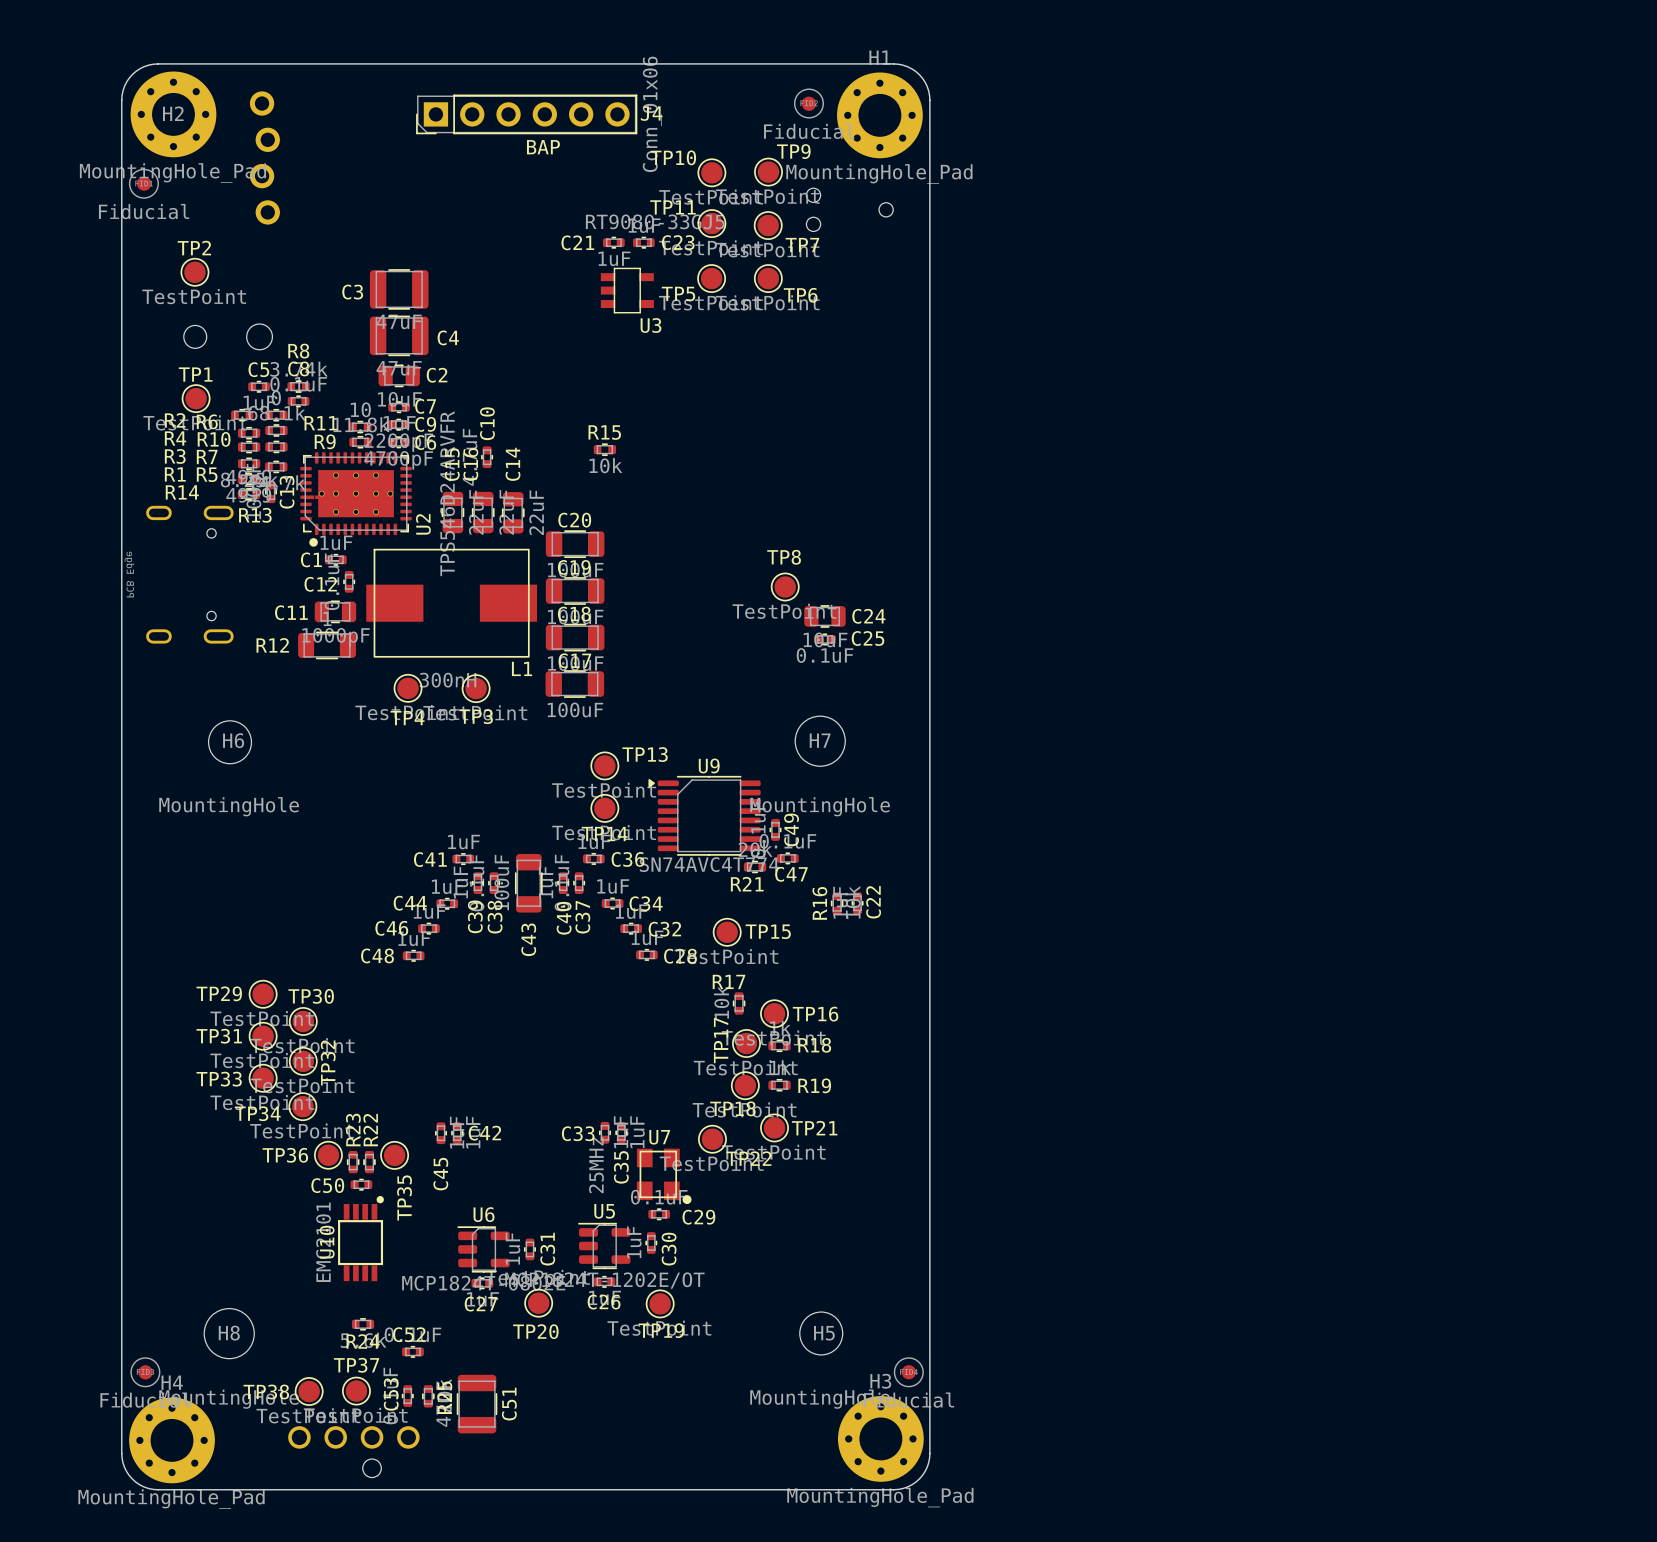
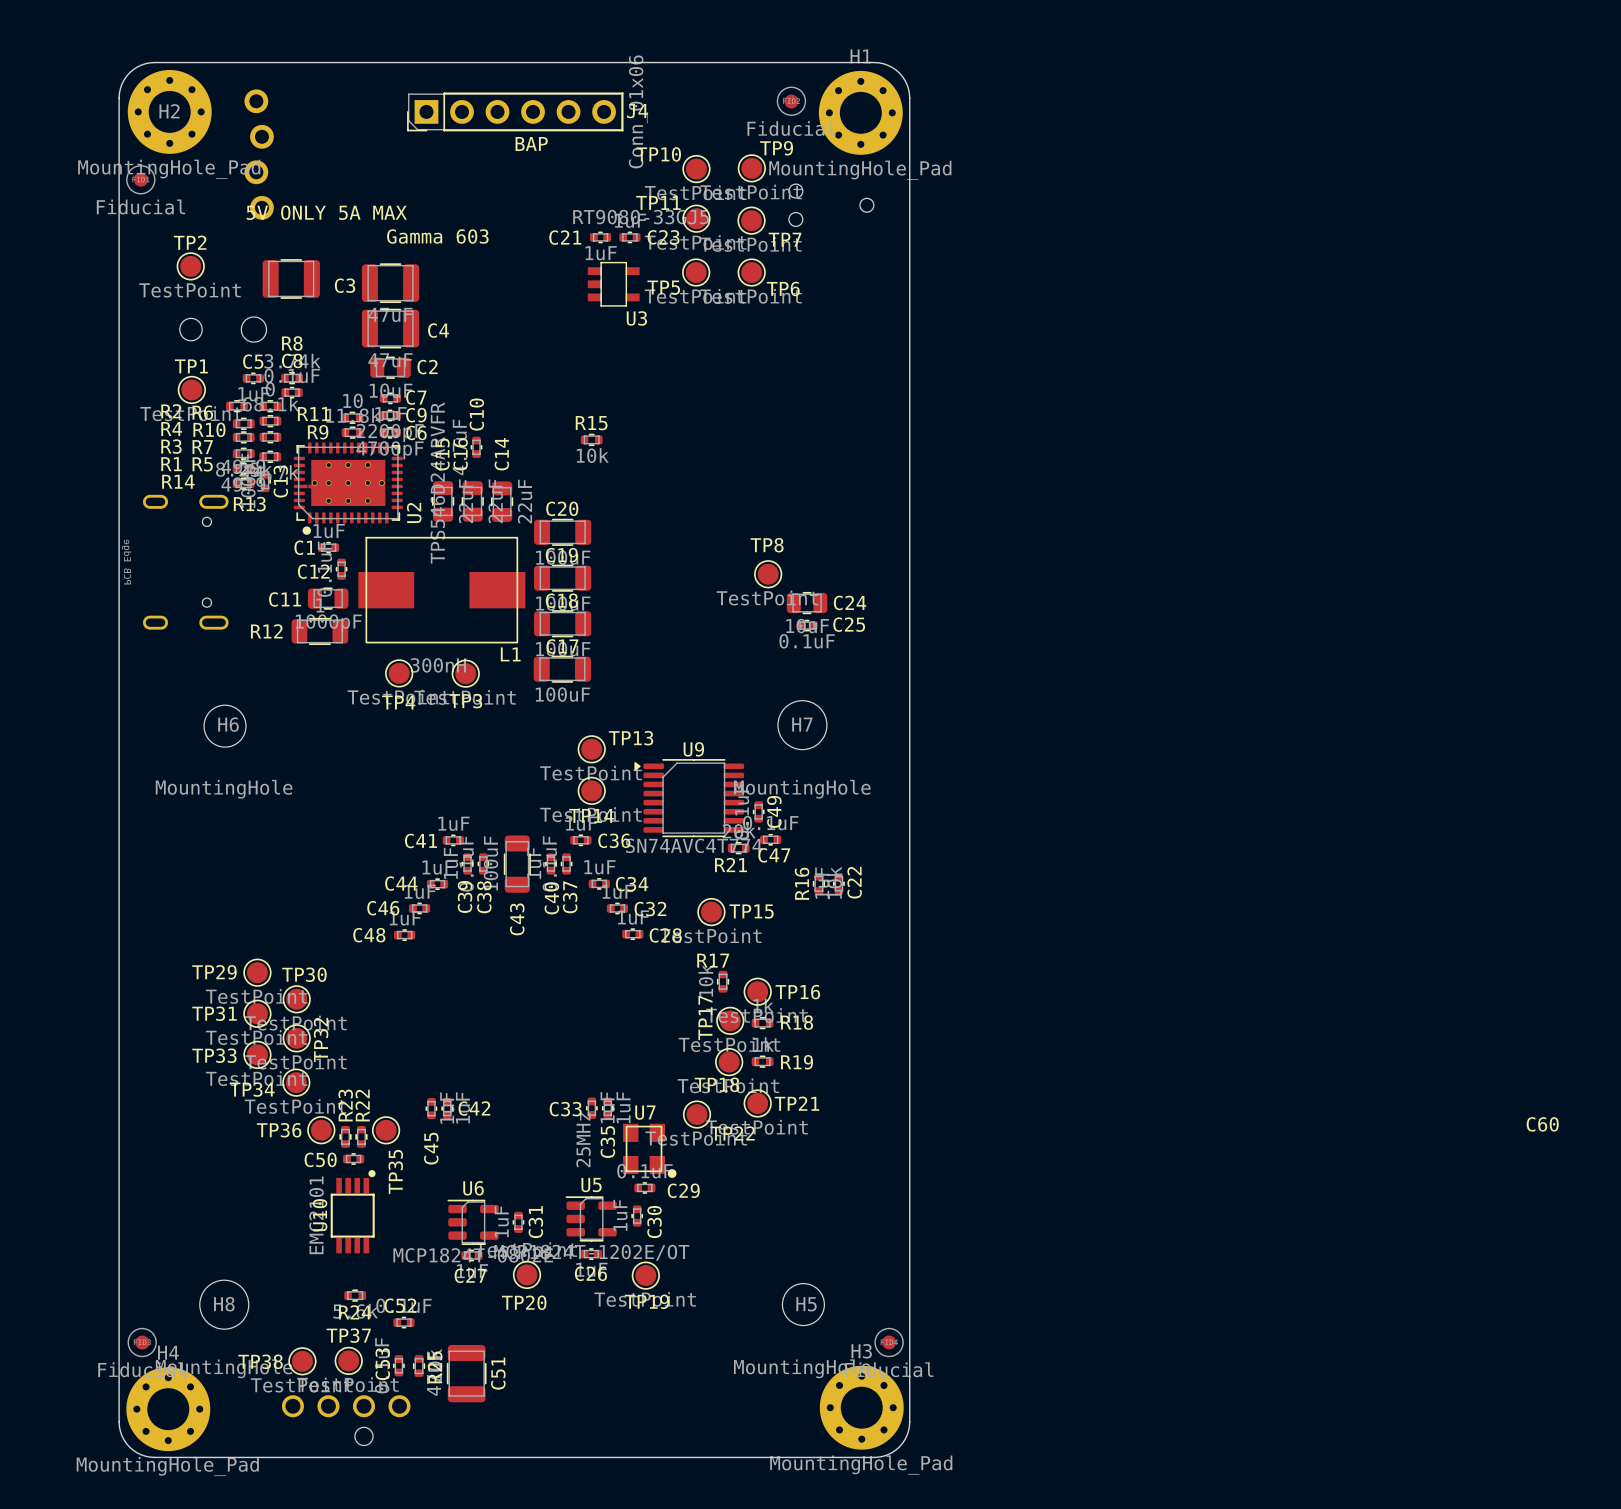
text: none -> 5V ONLY 5A MAX (326, 212)
text: none -> Gamma 603 (437, 236)
C60: none -> (291, 278)

